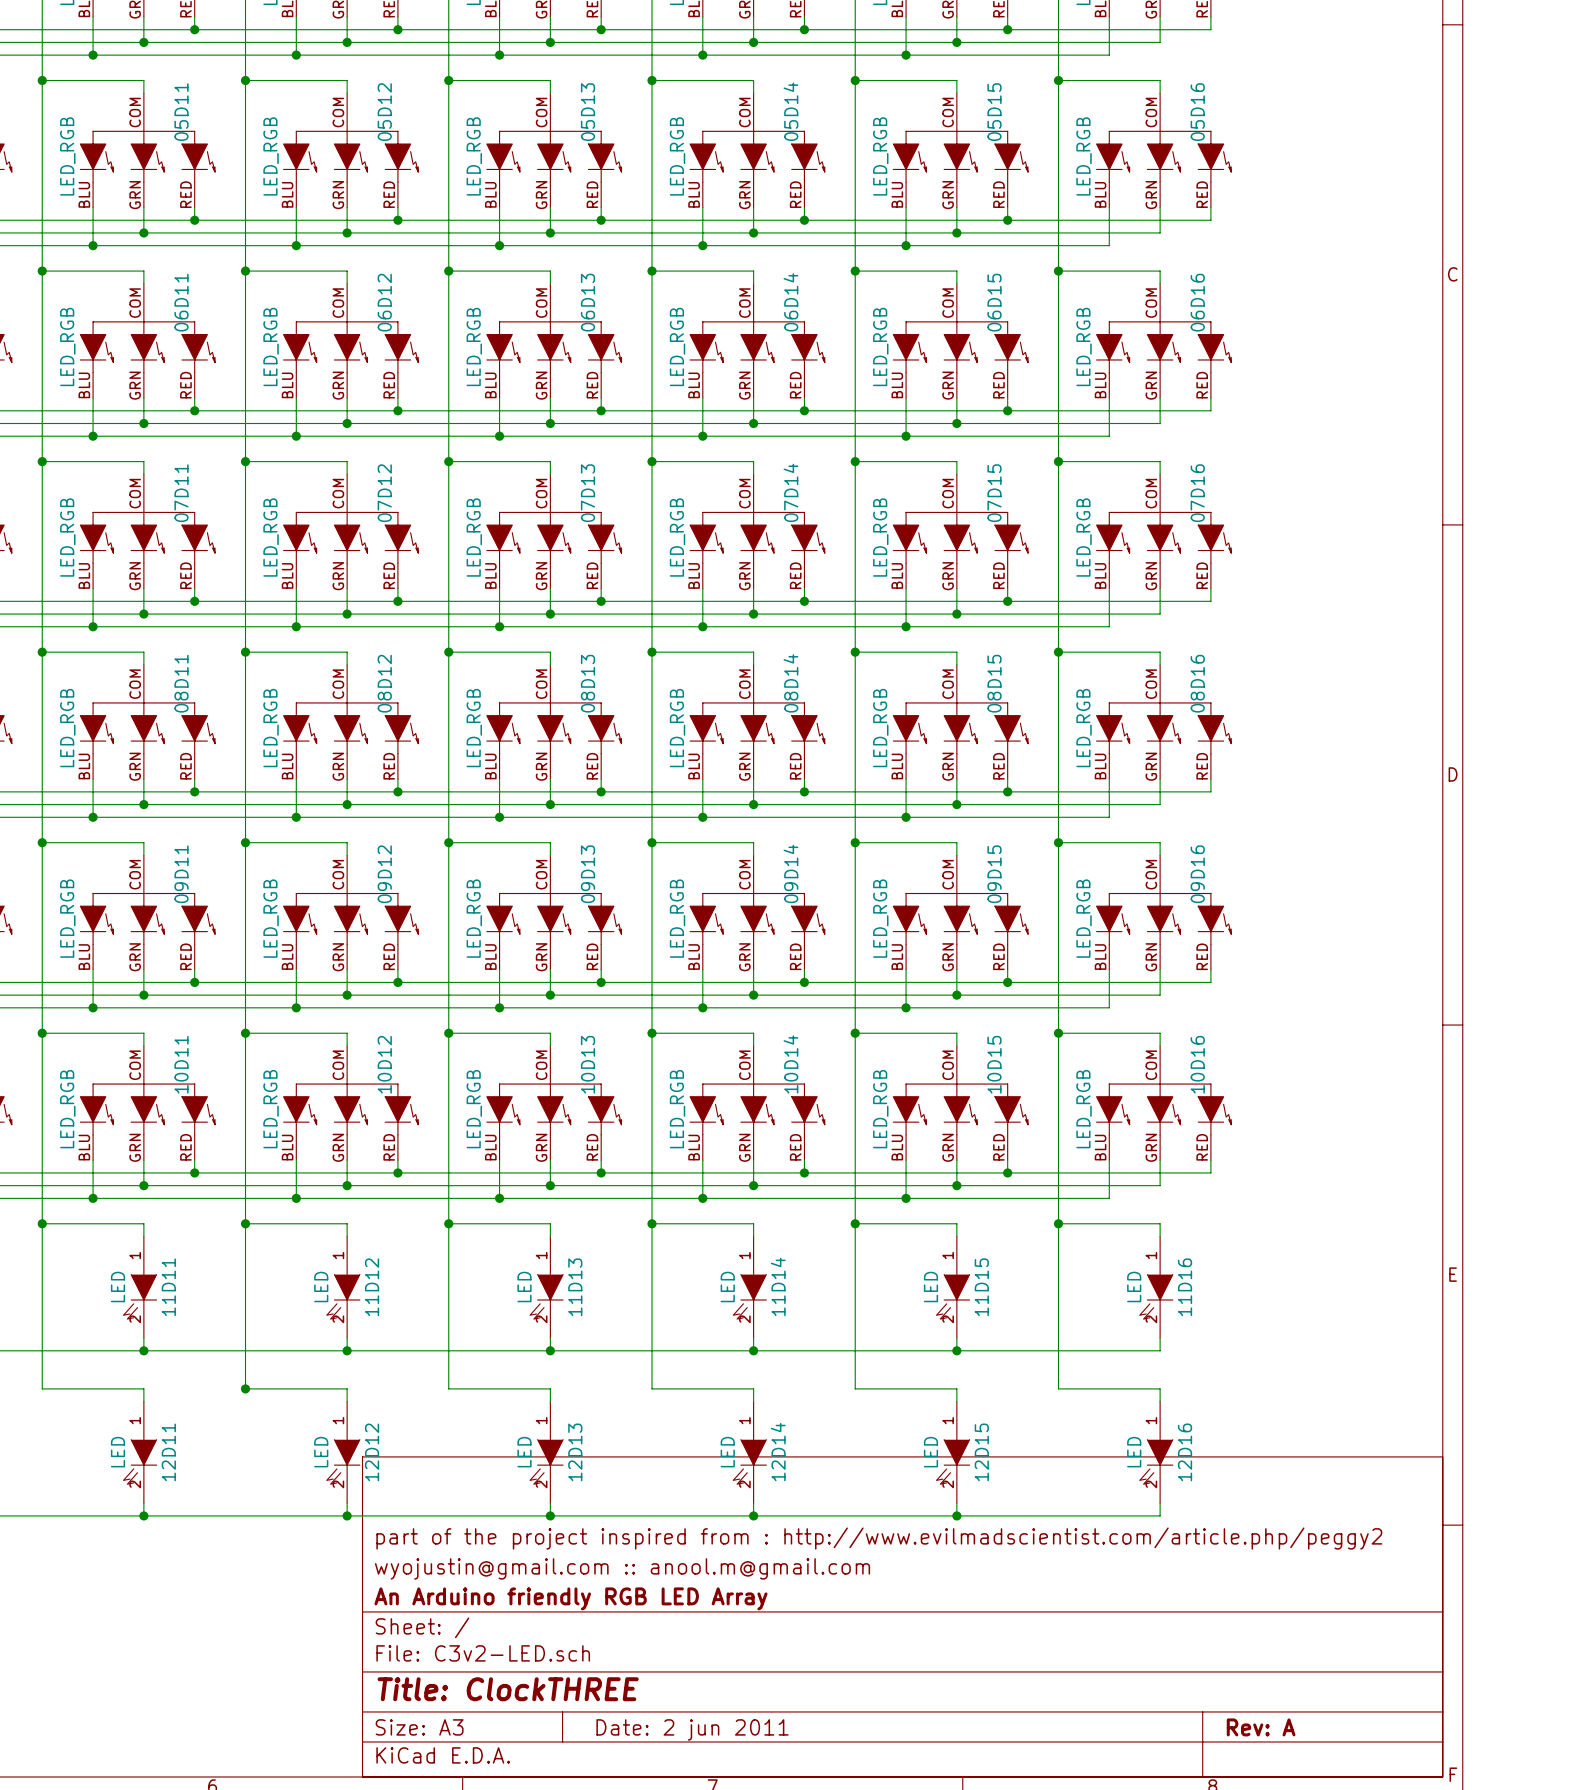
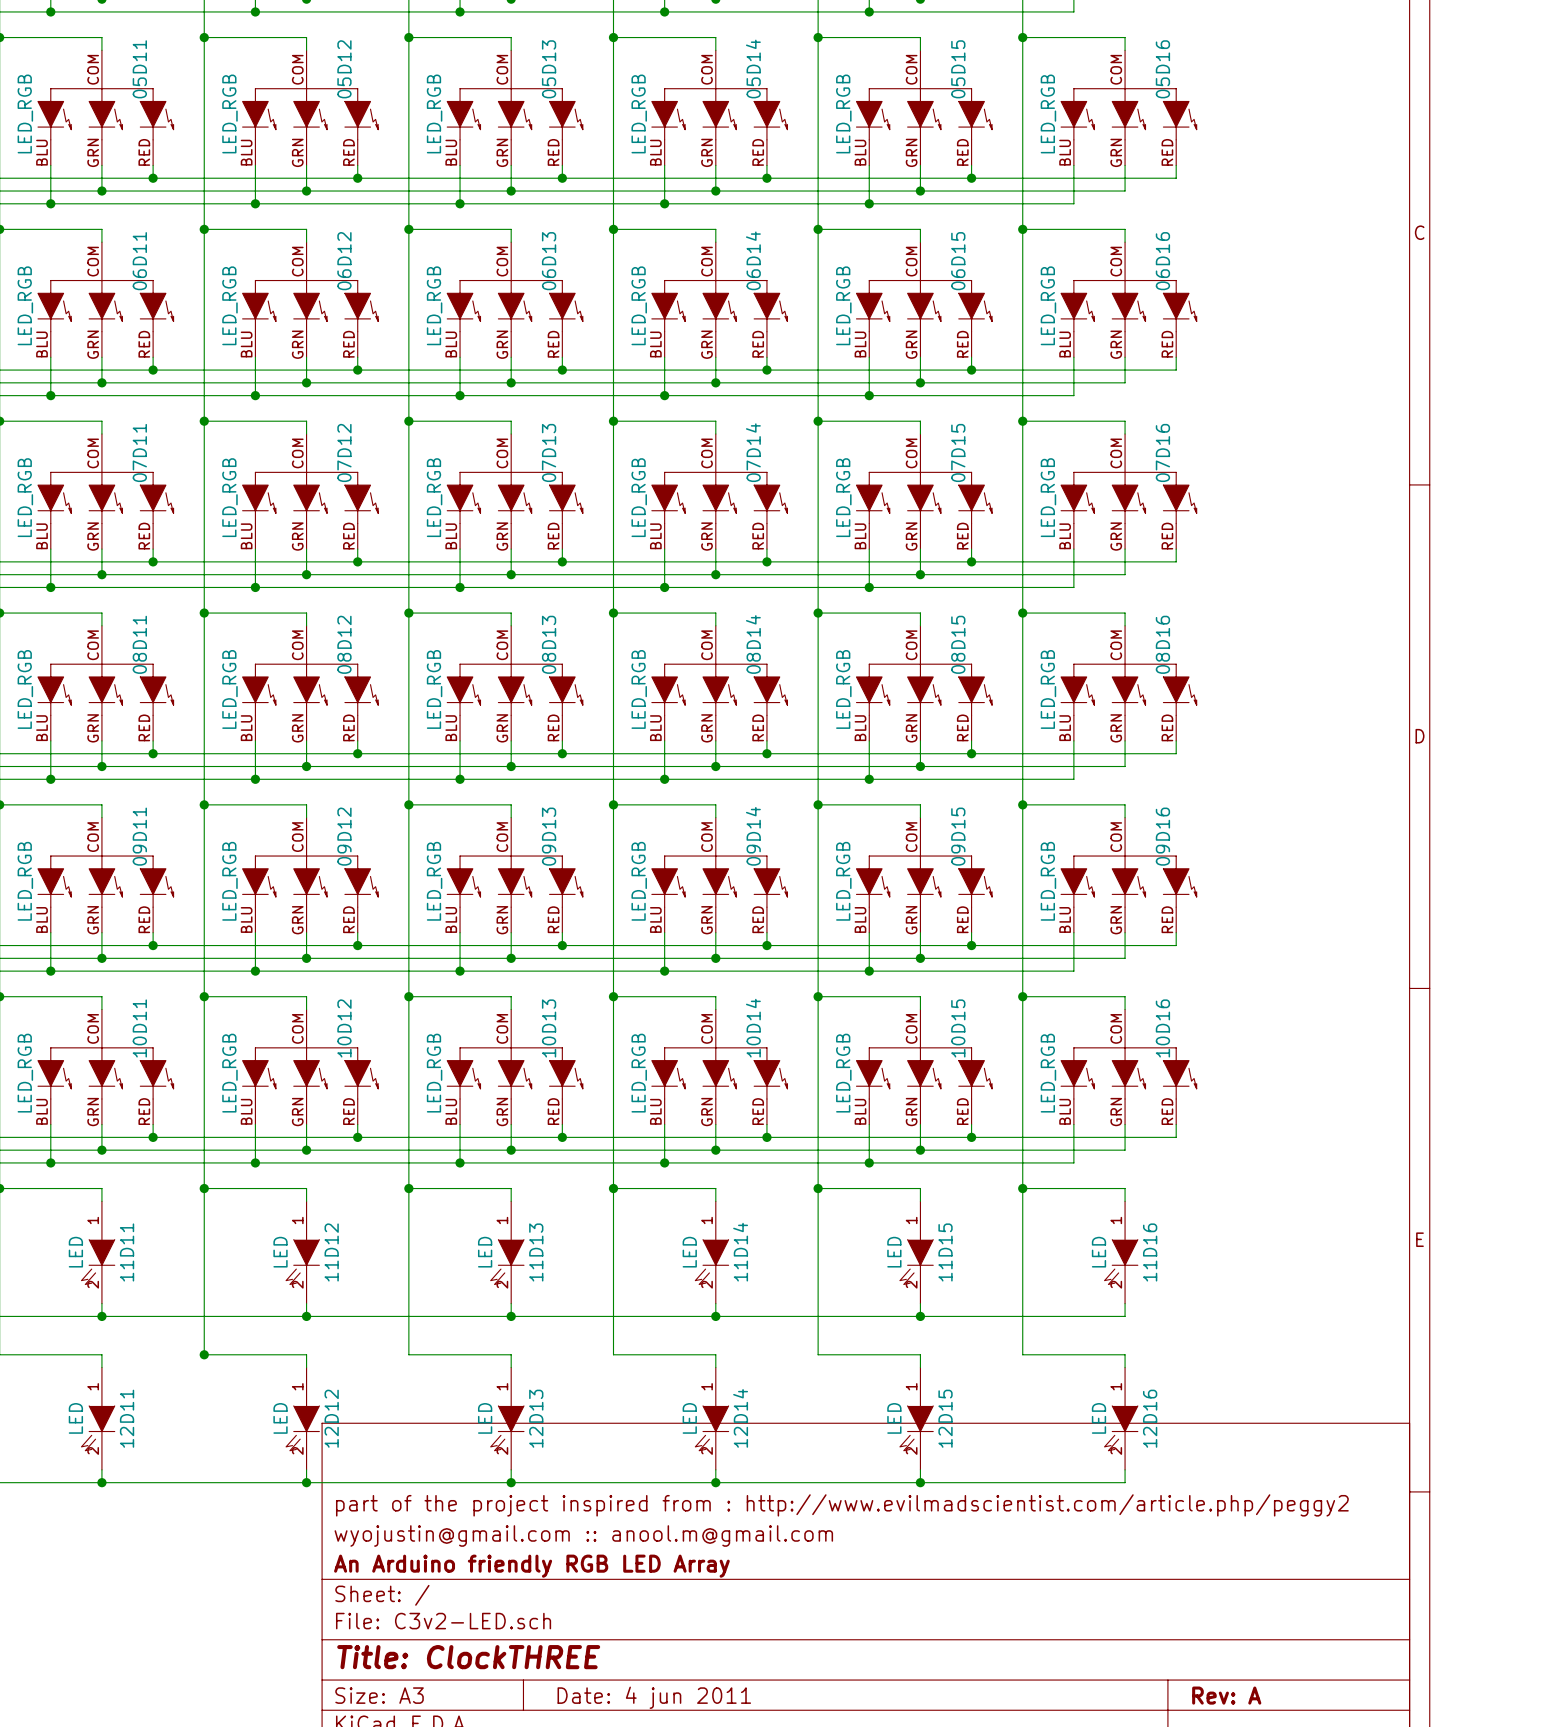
title block: Date: 2 jun 2011 (692, 1729) -> Date: 4 jun 2011 (654, 1697)

